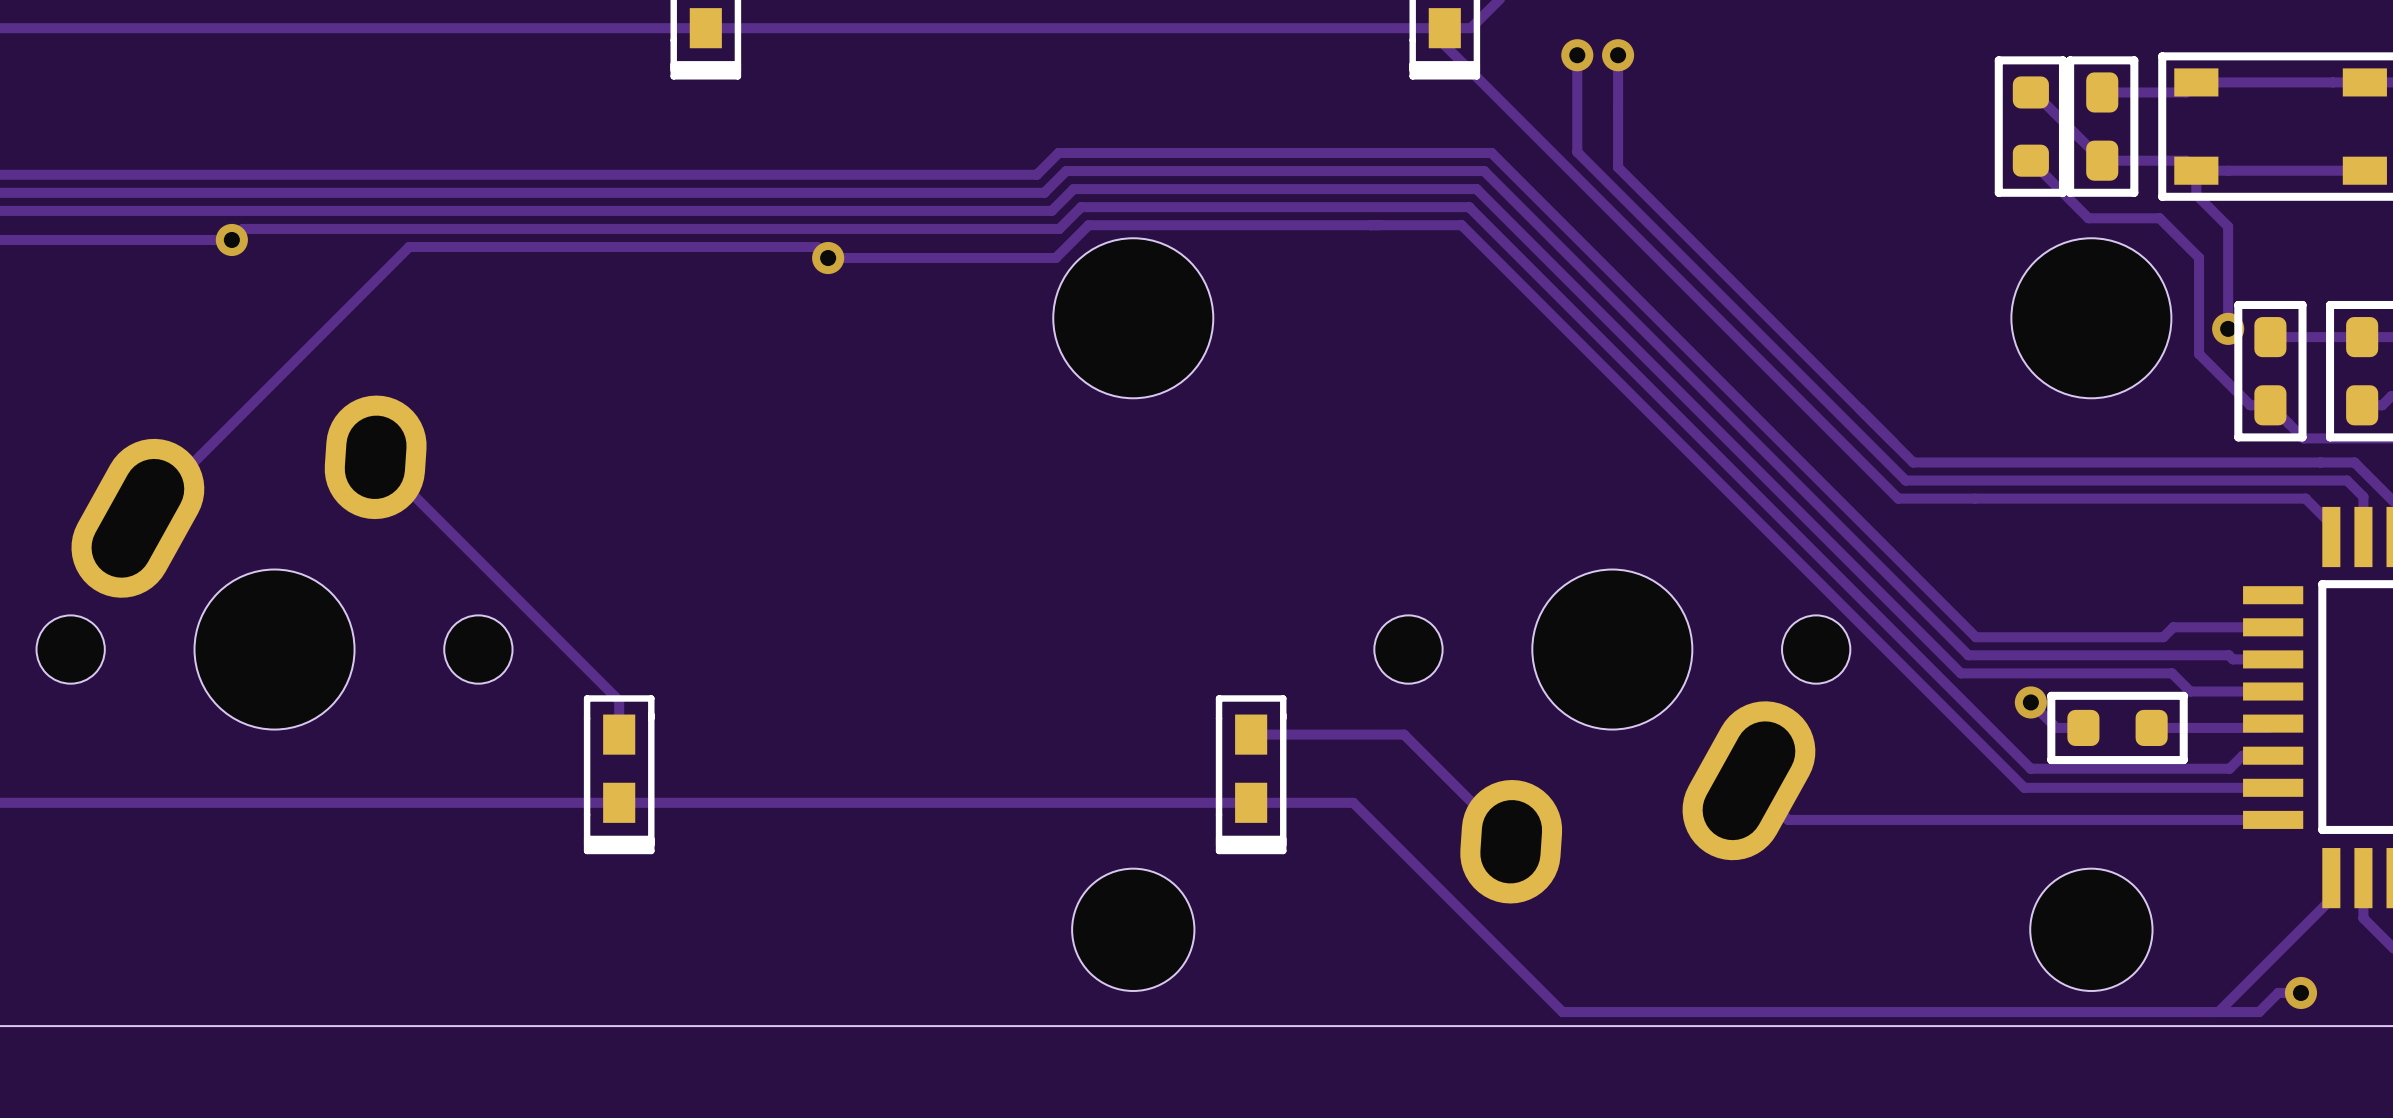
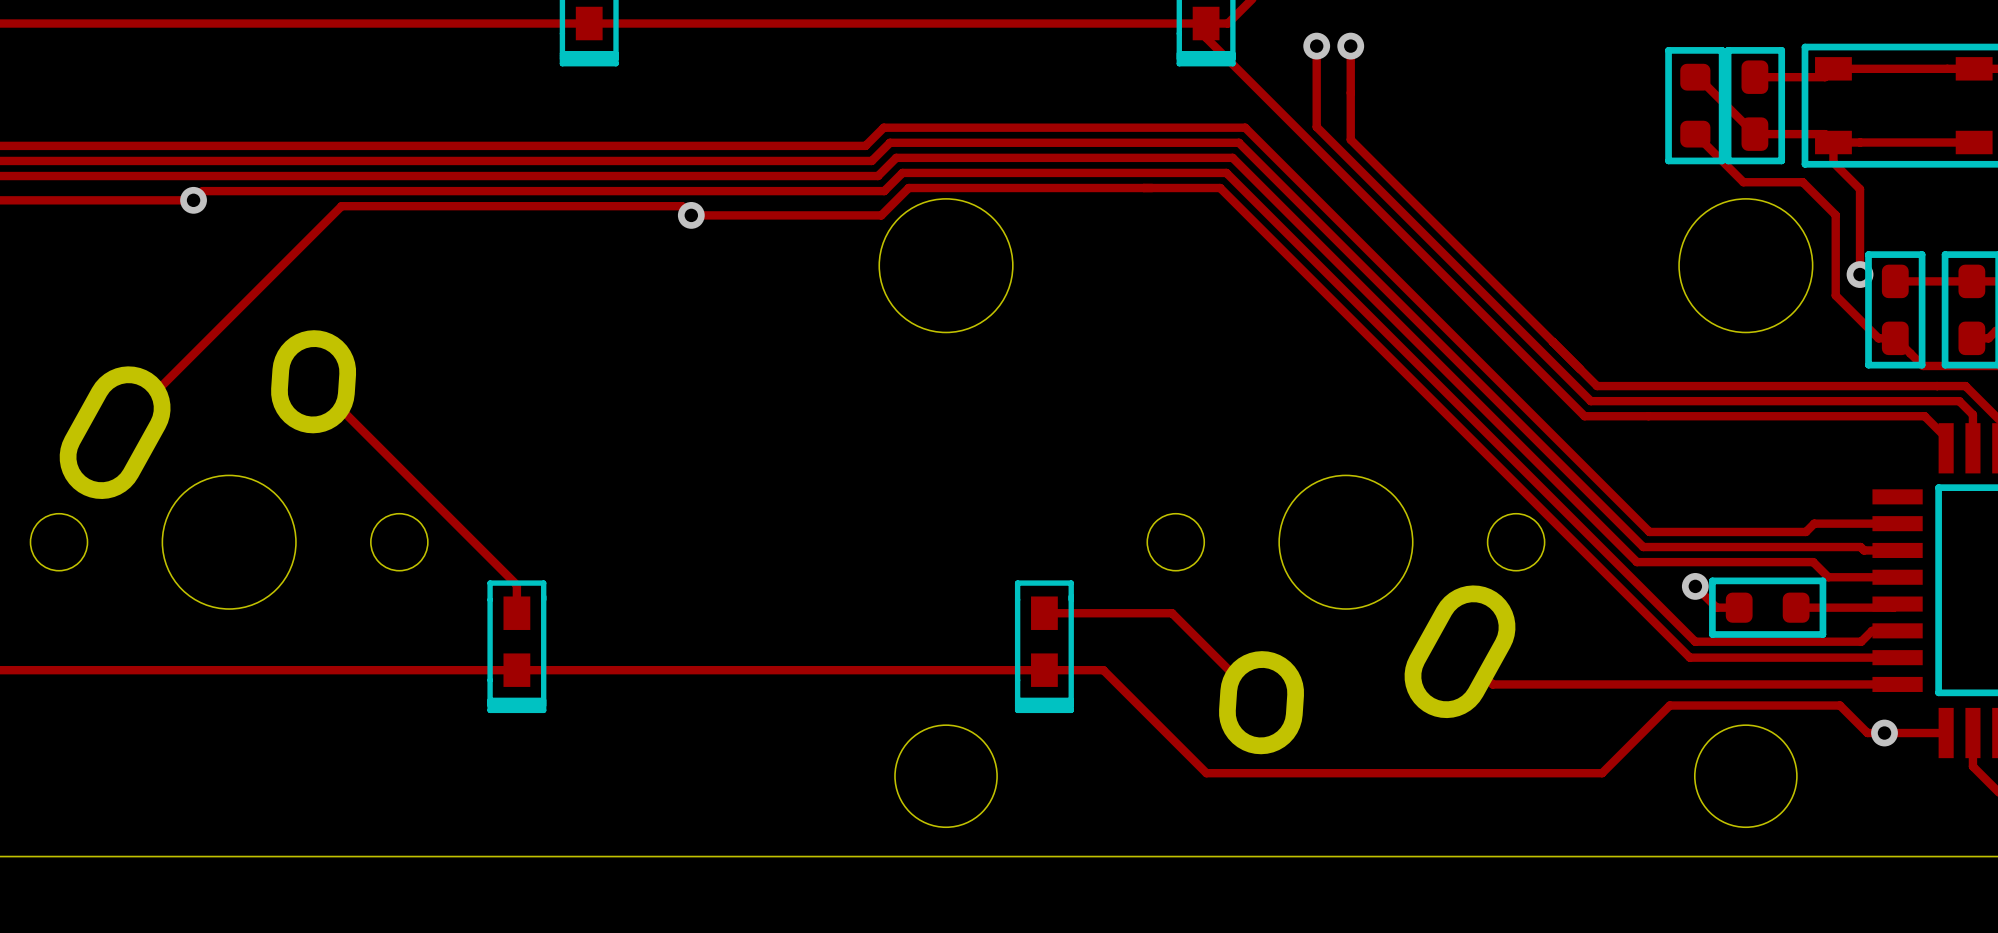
track: (1321, 802) (1353, 802) (1562, 1012) (2259, 1012) (2278, 992) (2300, 992) -> (1103, 670) (1206, 773) (1602, 773) (1669, 705) (1839, 705) (1867, 733) (1946, 733)
track: (2331, 899) (2218, 1012) -> none
via position: (2300, 992) -> (1884, 733)

